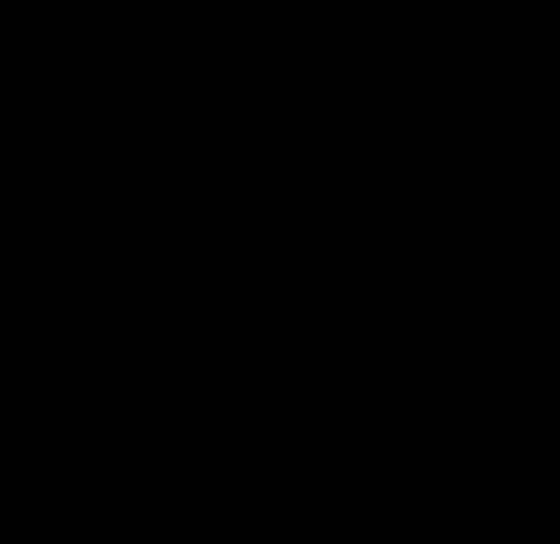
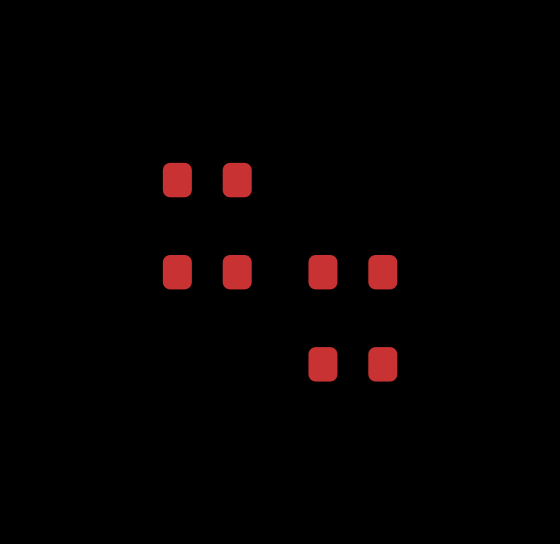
part: none -> (207, 180)
part: none -> (207, 272)
part: none -> (352, 272)
part: none -> (352, 364)

